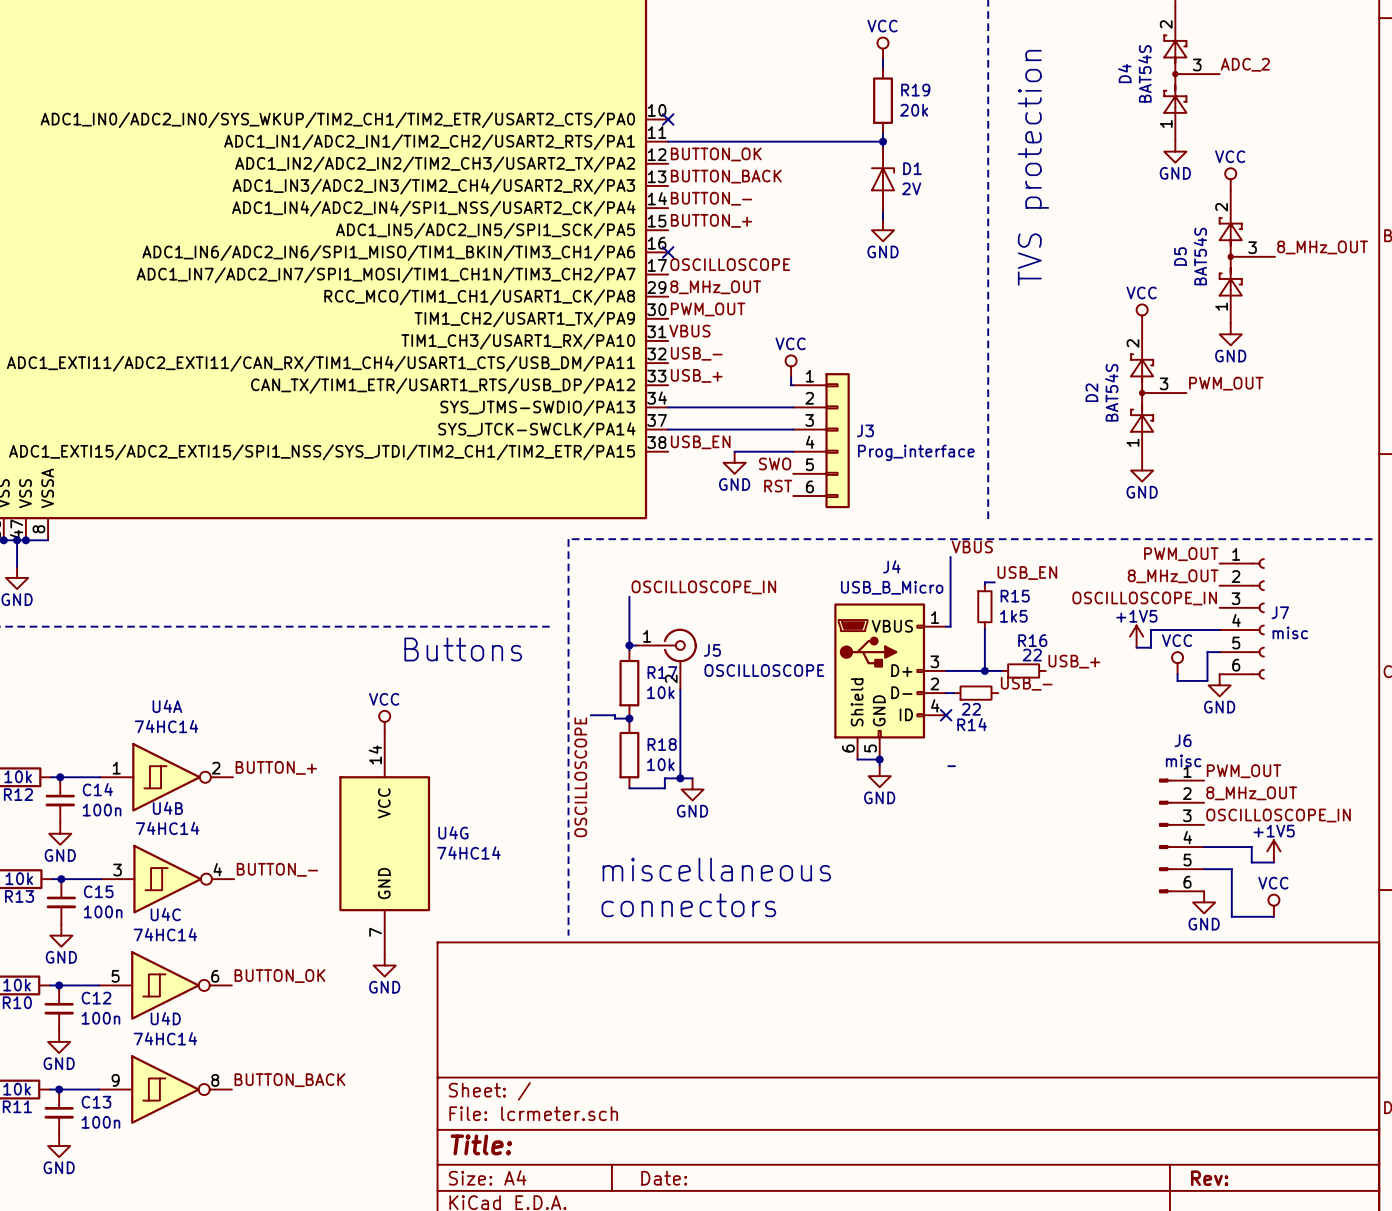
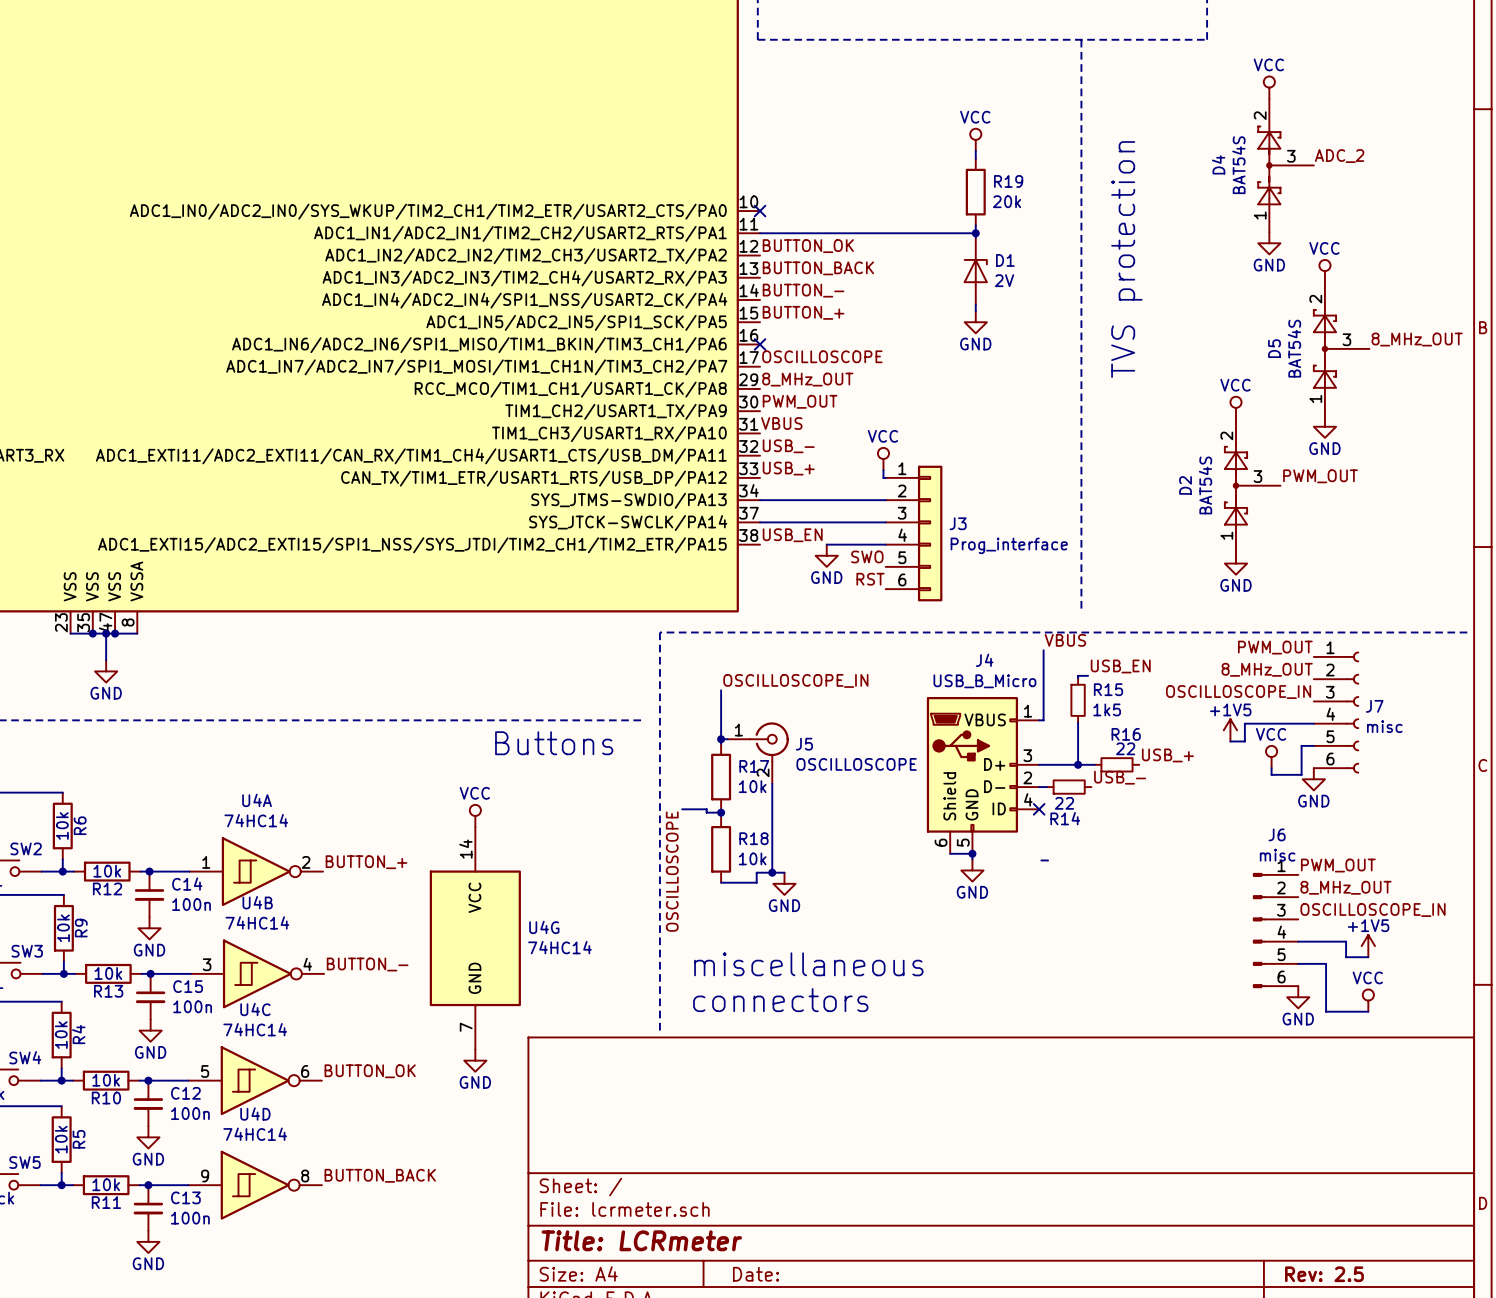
title block: Title: (481, 1144) -> Title: LCRmeter (641, 1240)
title block: Rev: (1209, 1178) -> Rev: 2.5 (1324, 1274)

